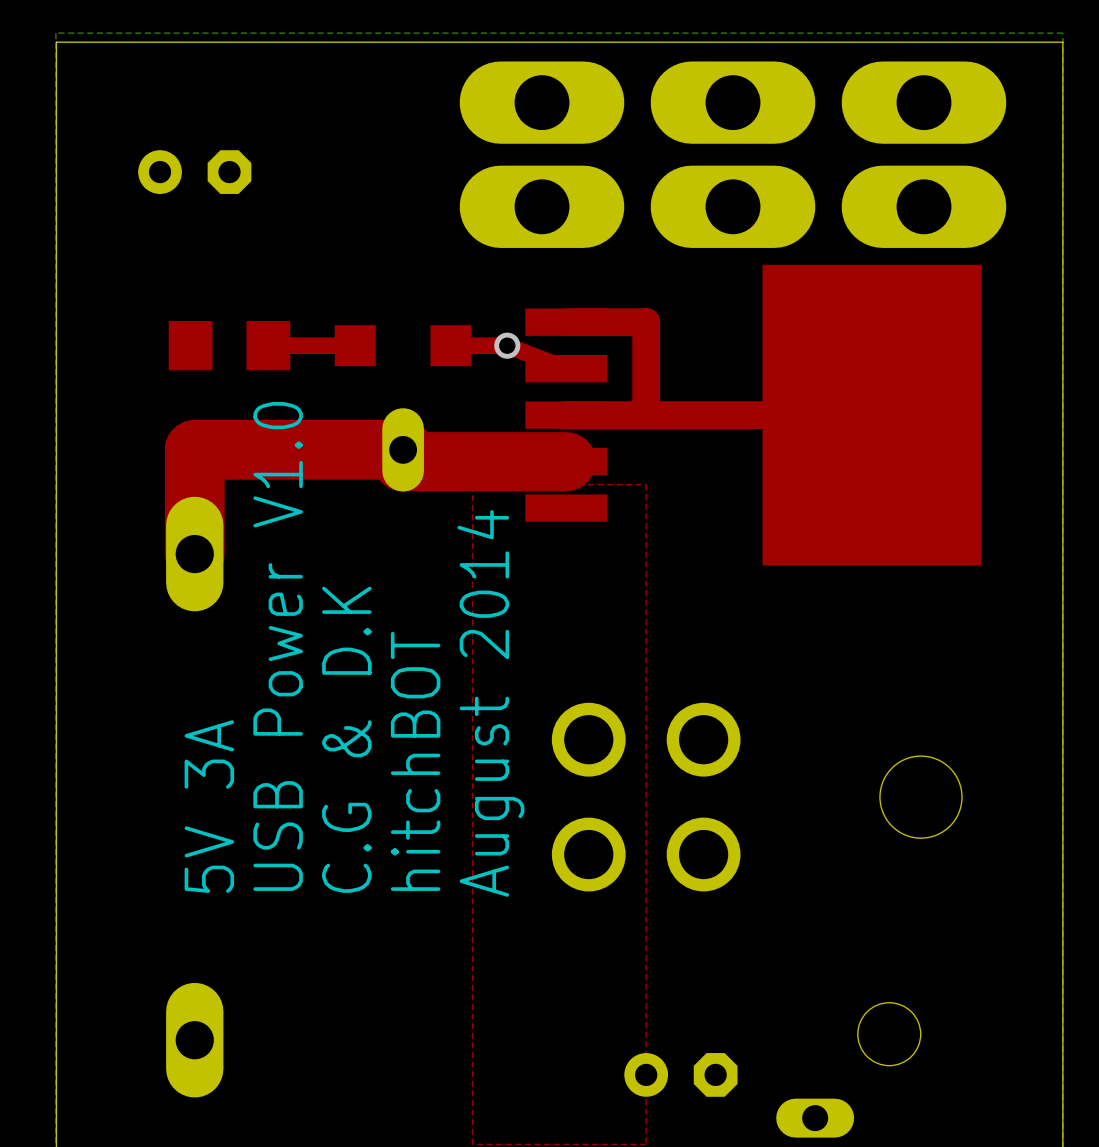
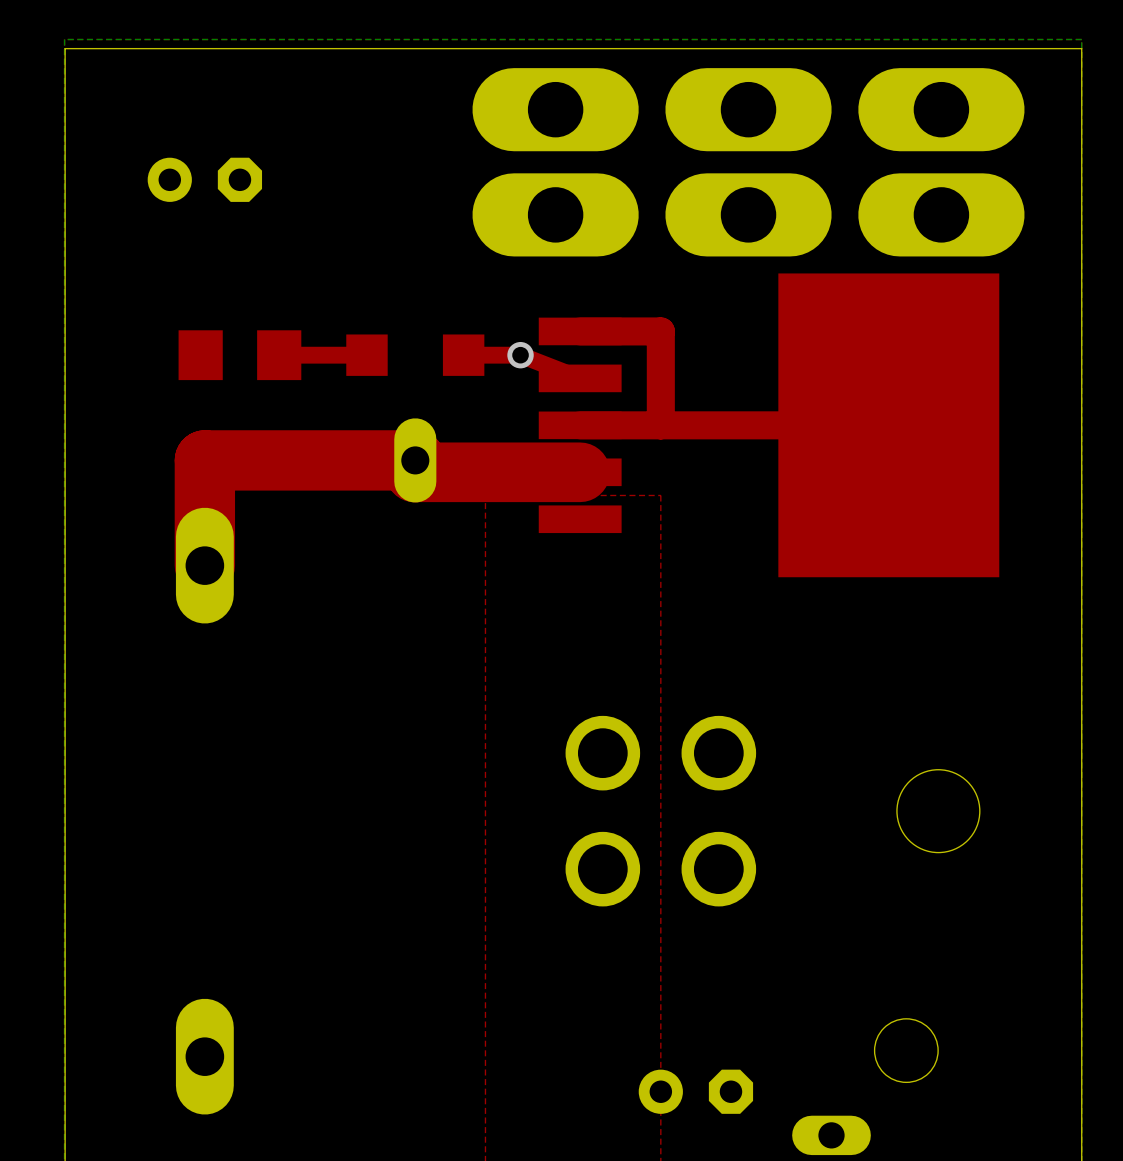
text: USB Power V1.0 (278, 646) -> none
text: August 2014 (490, 703) -> none
text: C.G & D.K (346, 739) -> none
text: hitchBOT (415, 761) -> none
text: 5V 3A (209, 806) -> none

